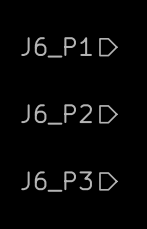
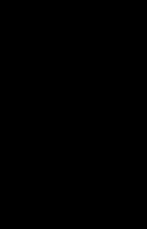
hierarchical label: J6_P1 (56, 47) -> none
hierarchical label: J6_P2 (56, 114) -> none
hierarchical label: J6_P3 (56, 181) -> none

